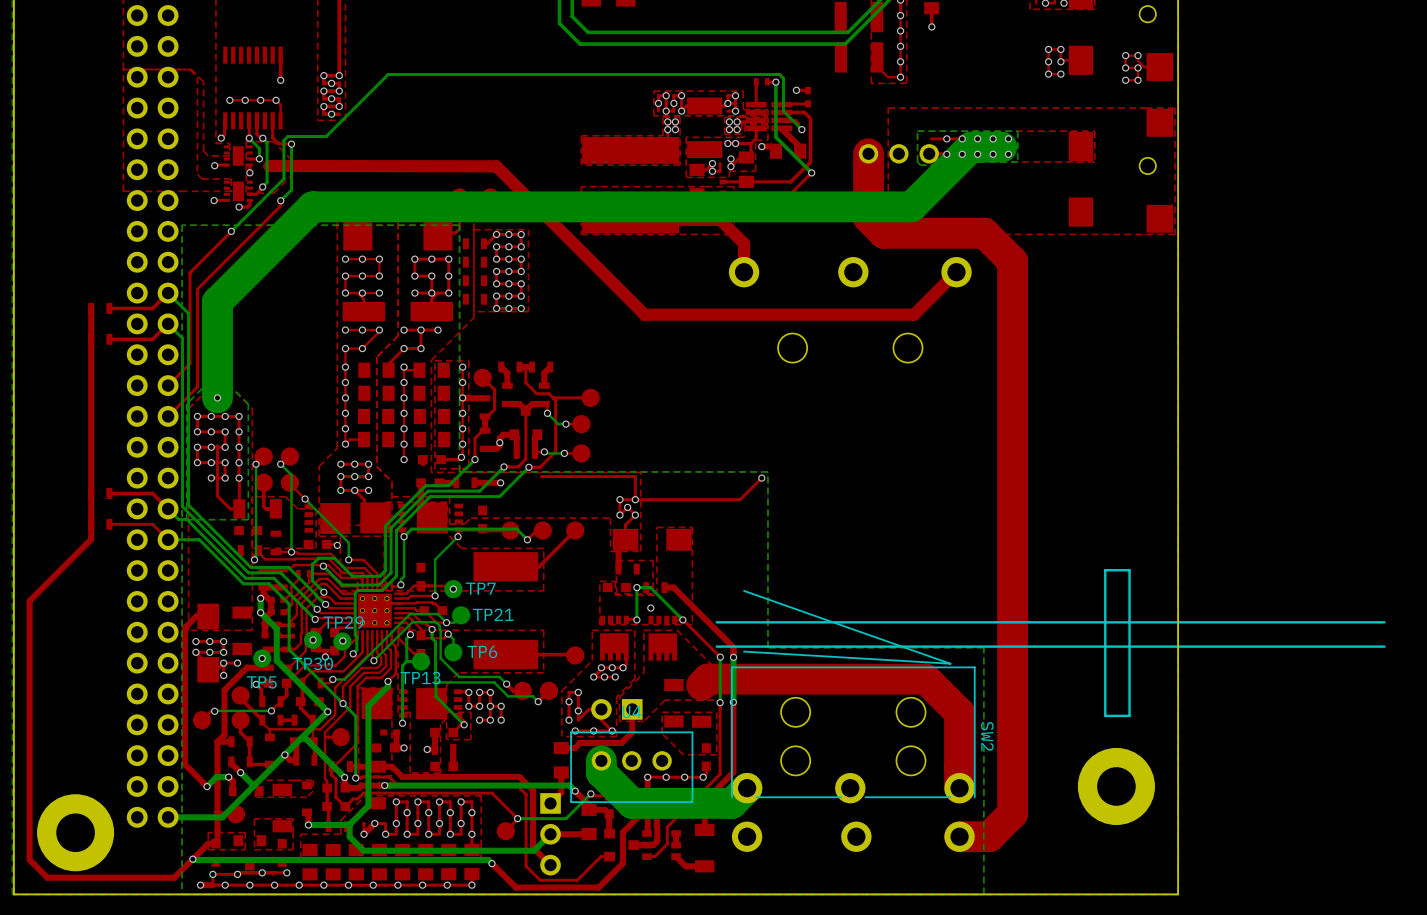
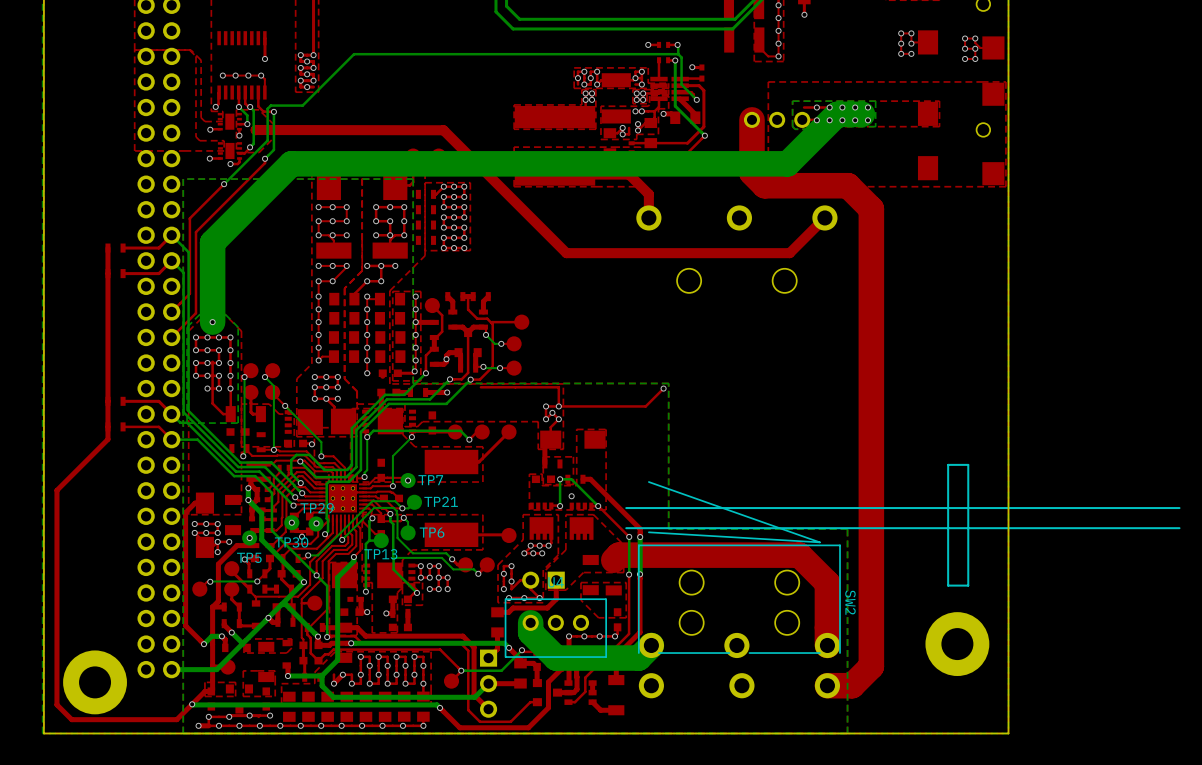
via: none -> (648, 44)
top track: none -> (659, 44) (648, 44)
part: none -> (663, 44)
top track: none -> (677, 44) (668, 44)
bottom track: none -> (677, 44) (678, 54)
via: none -> (677, 44)

